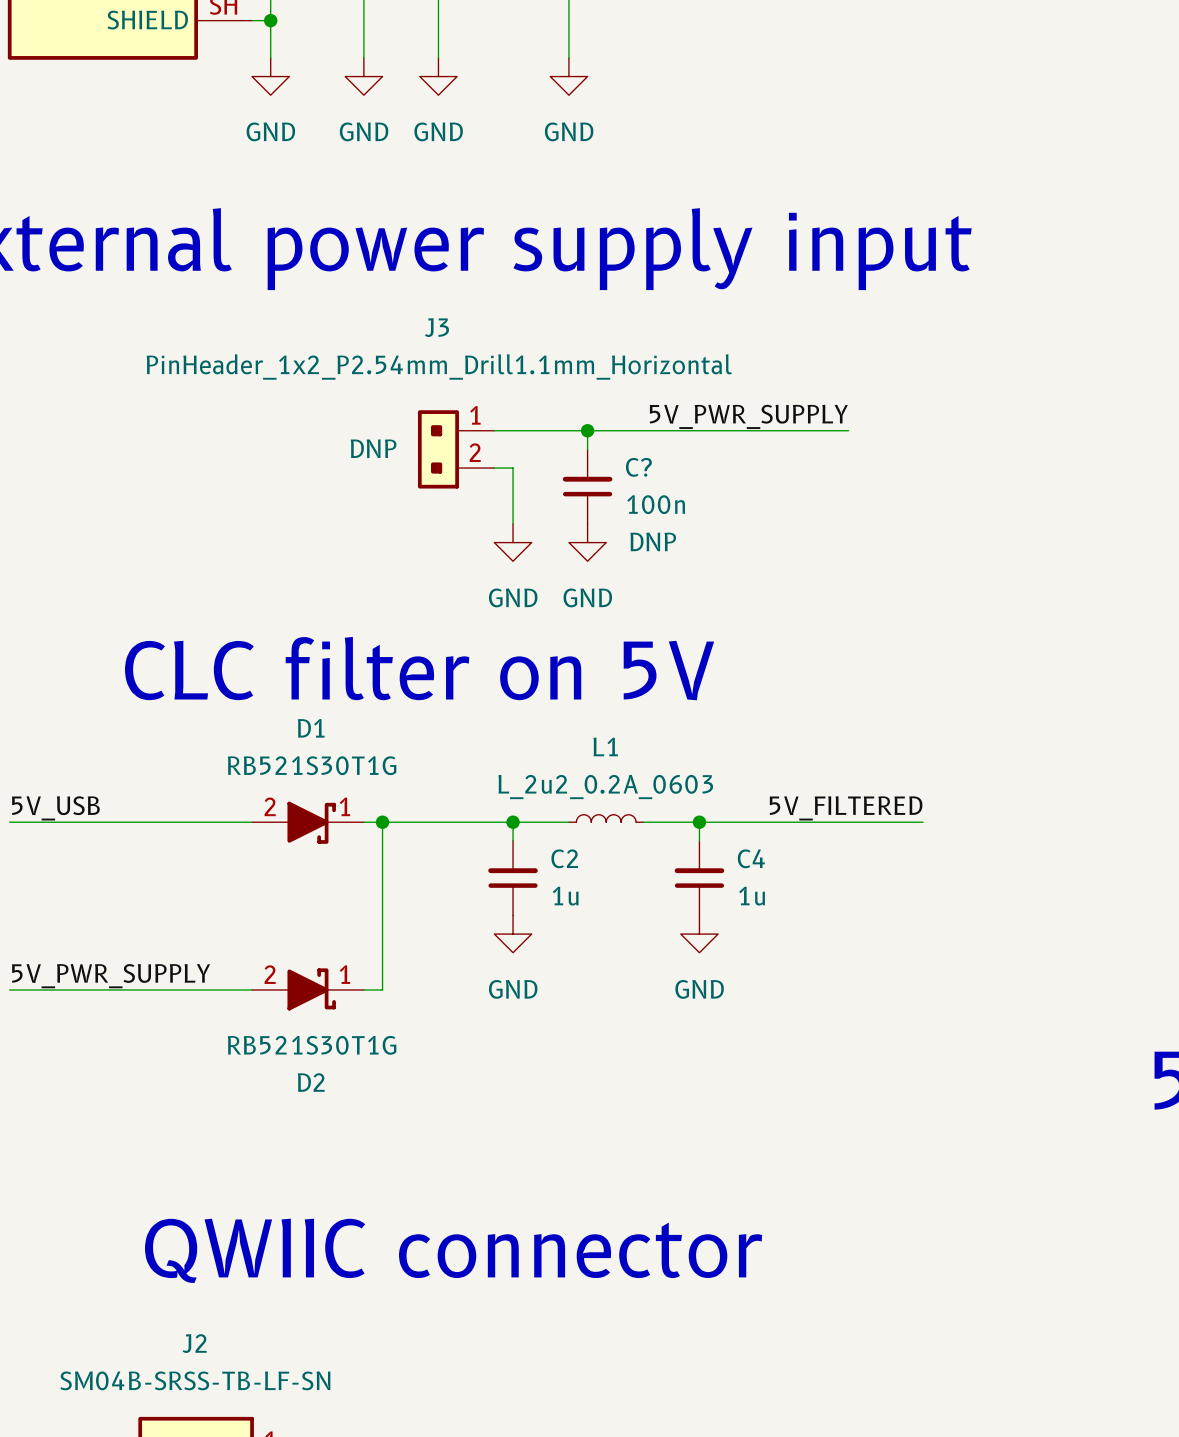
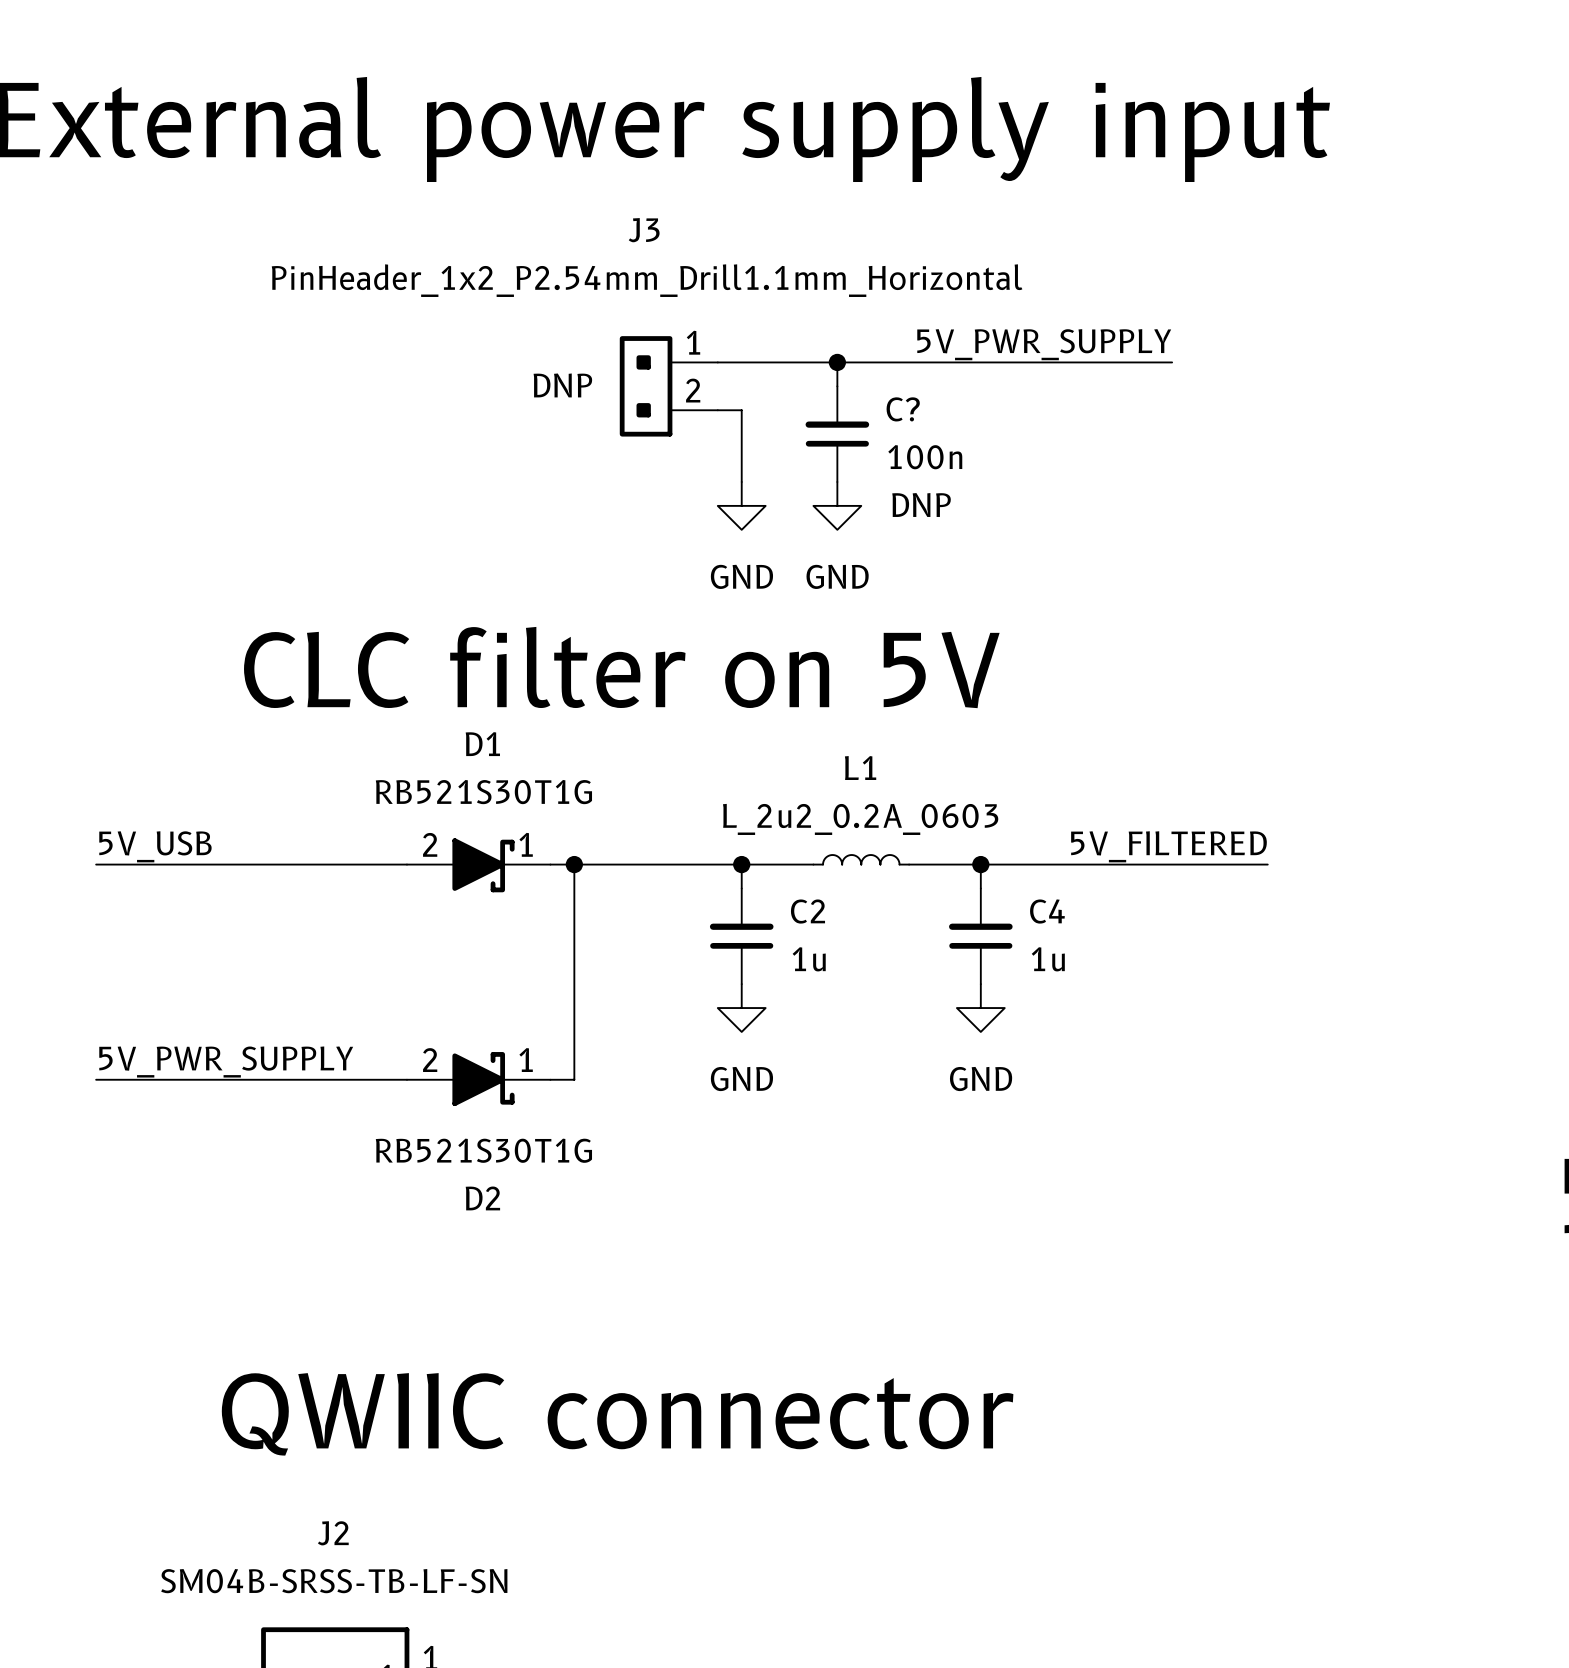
text position: QWIIC connector (453, 1250) -> QWIIC connector (617, 1414)

